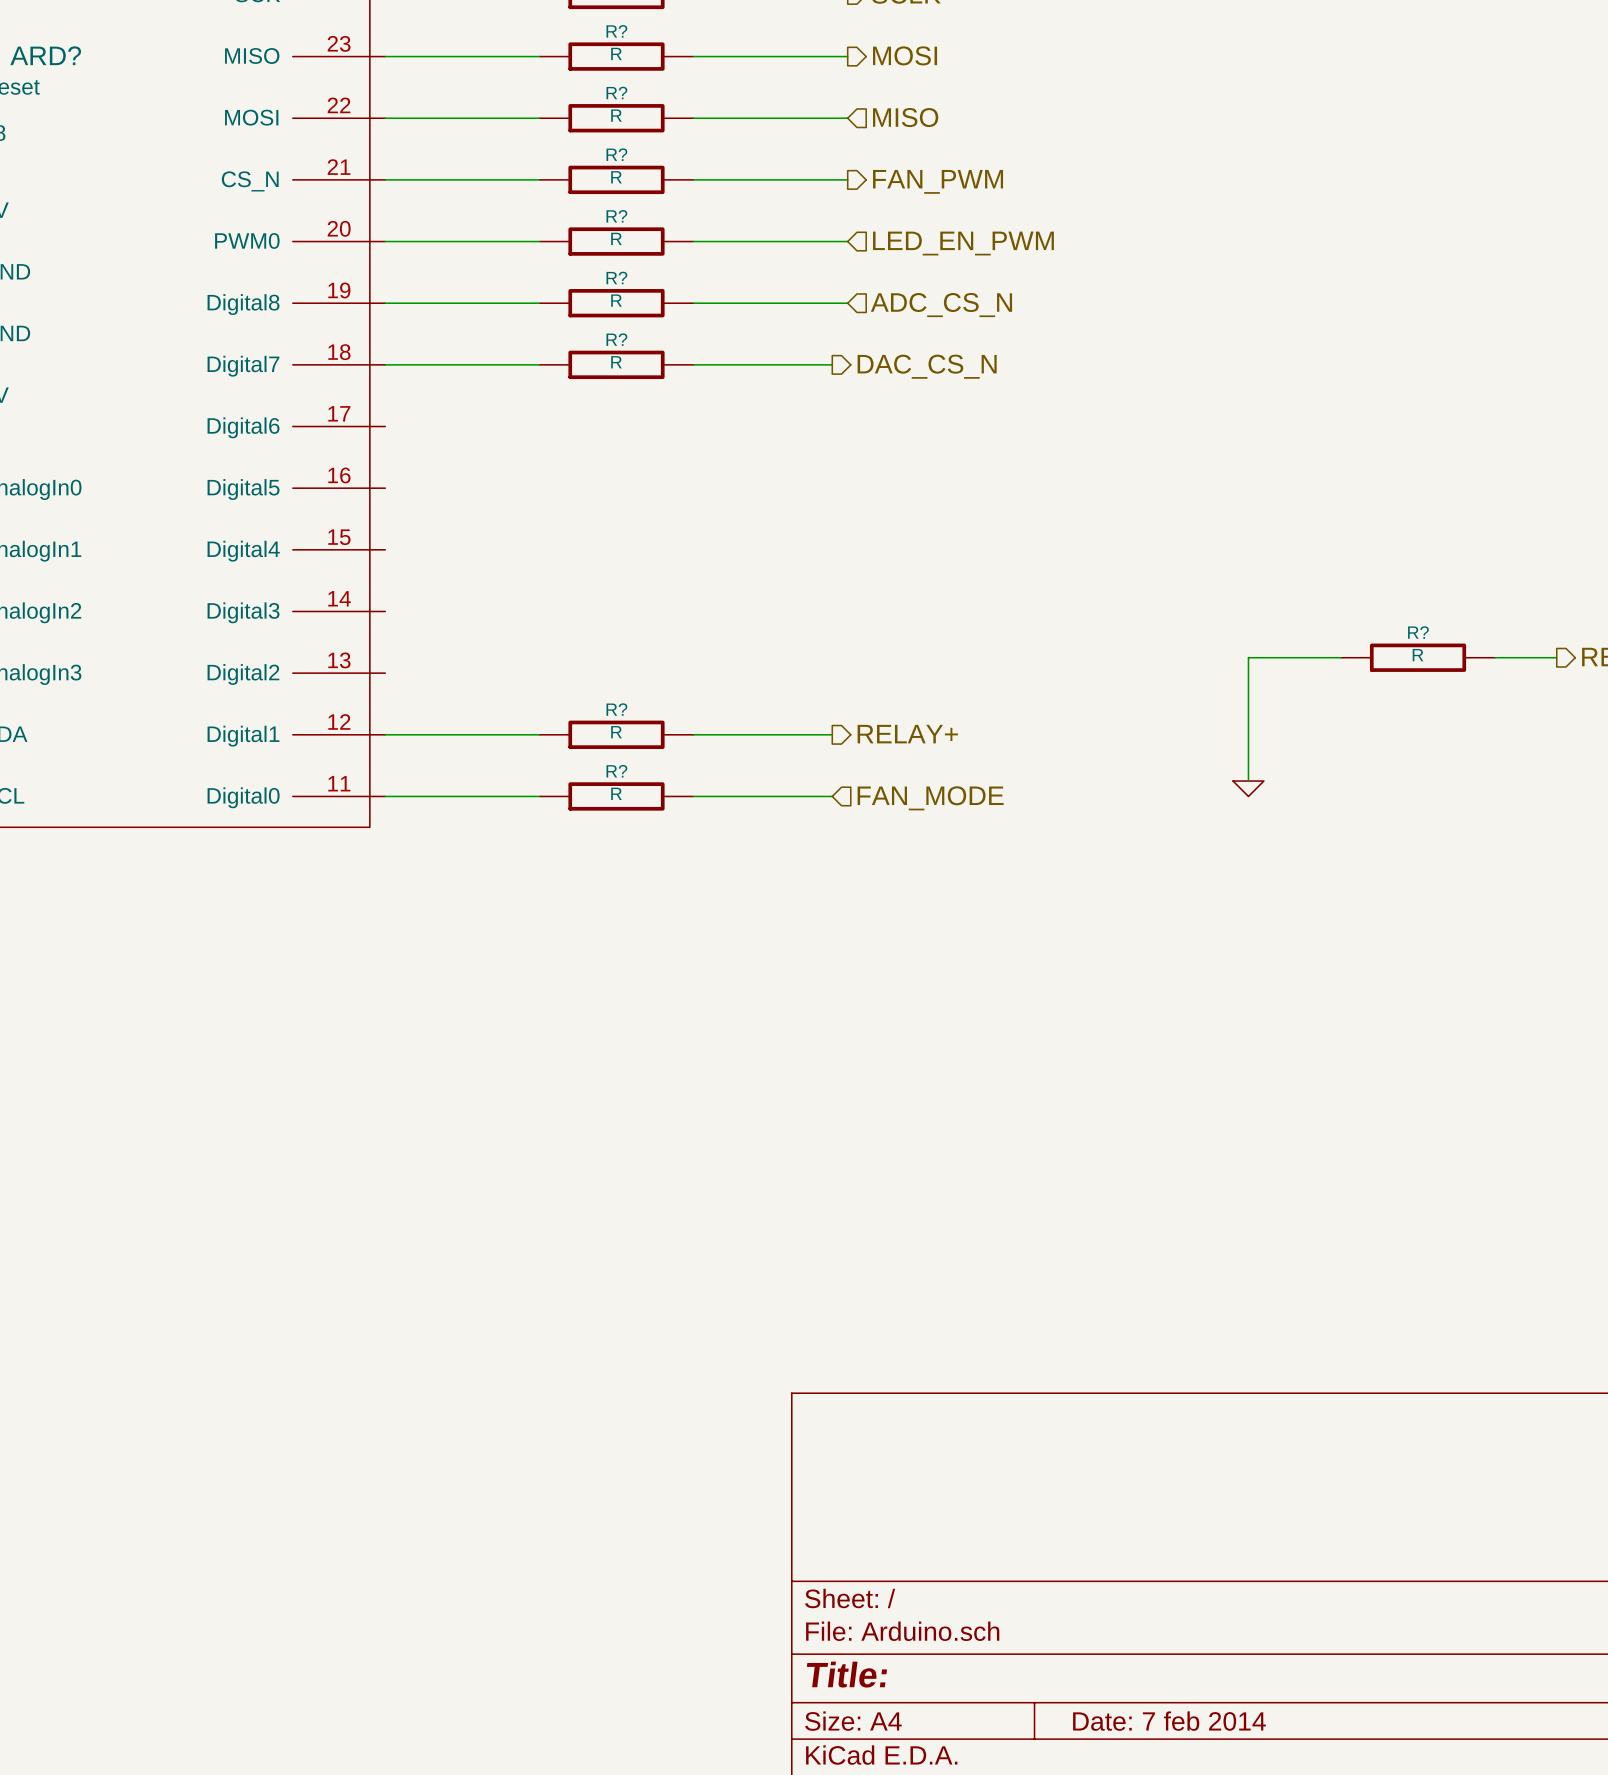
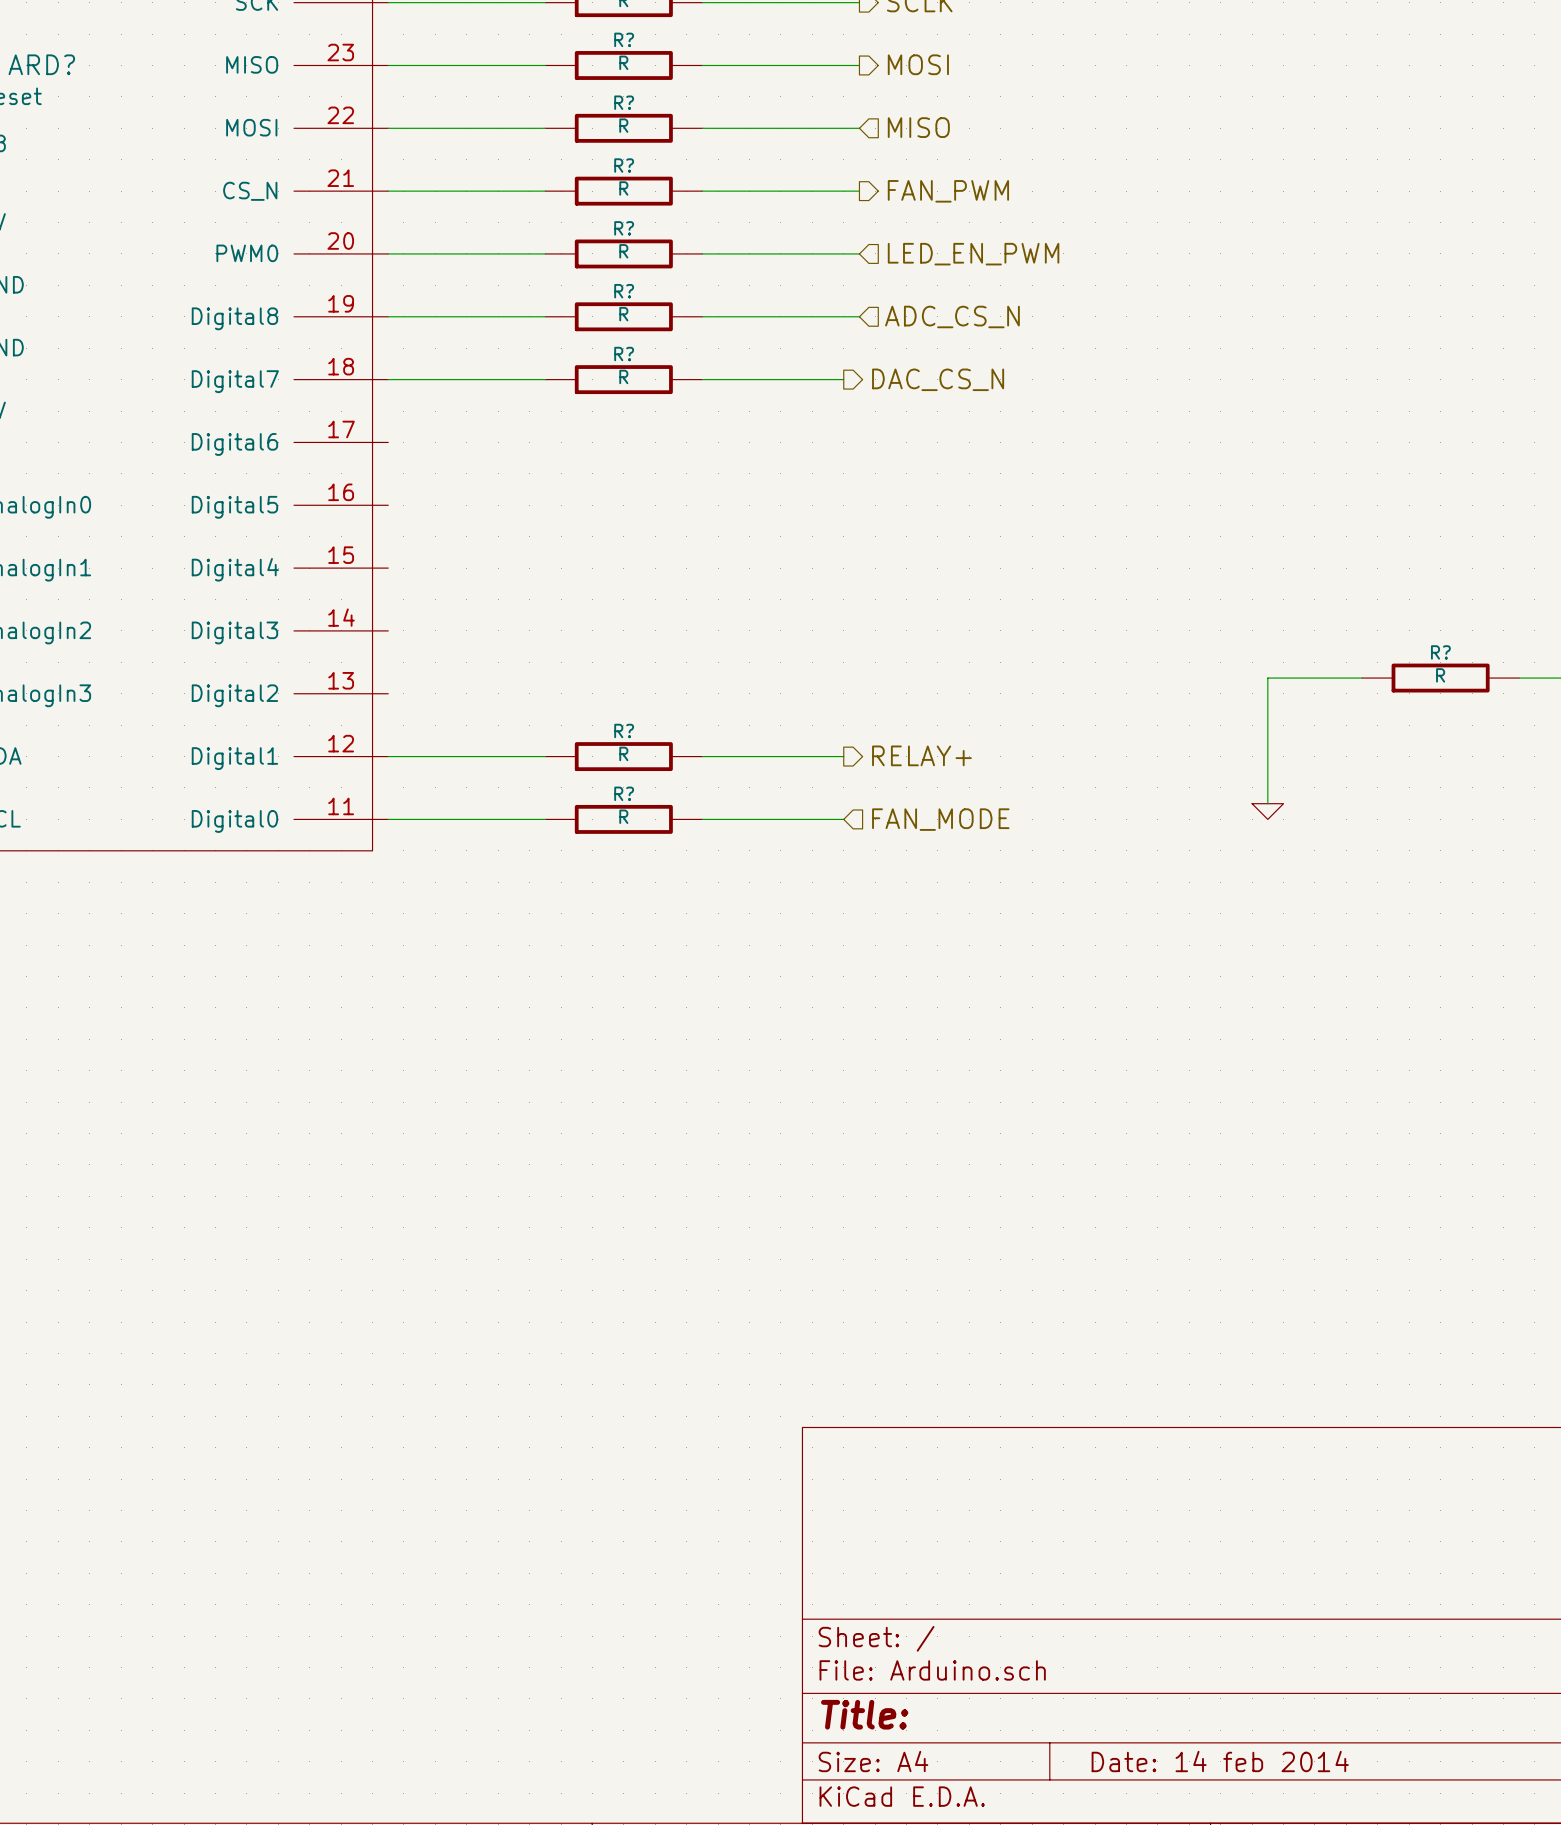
title block: Date: 7 feb 2014 (1169, 1721) -> Date: 14 feb 2014 (1220, 1761)

